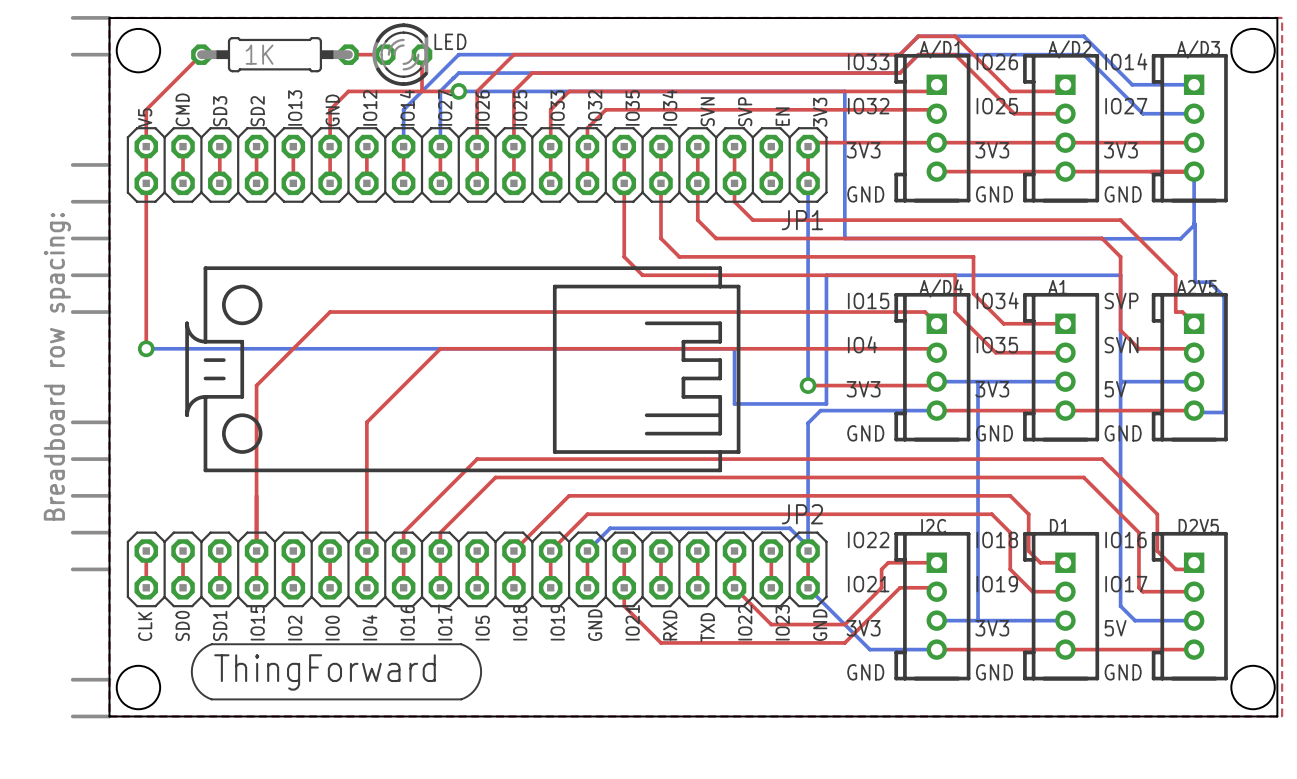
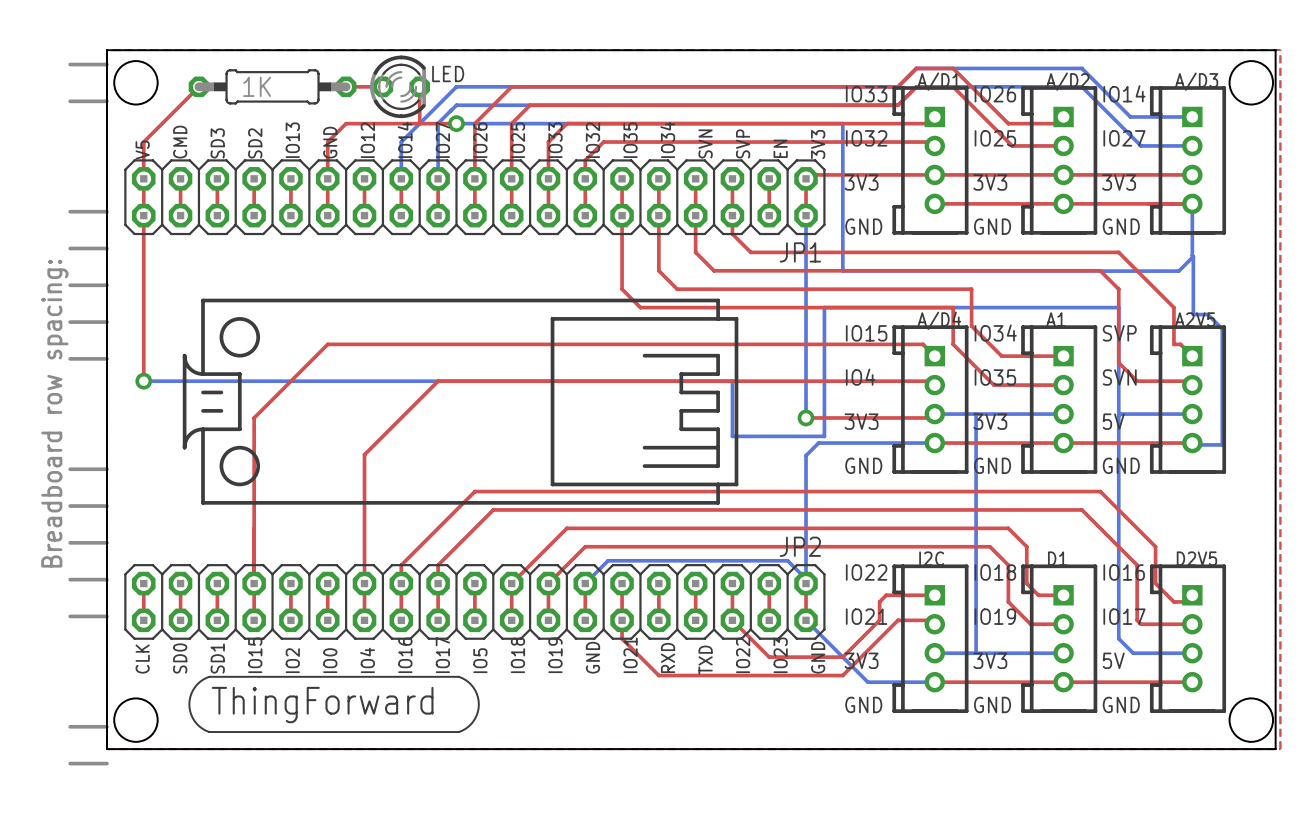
drawing position: (91, 367) -> (88, 414)

